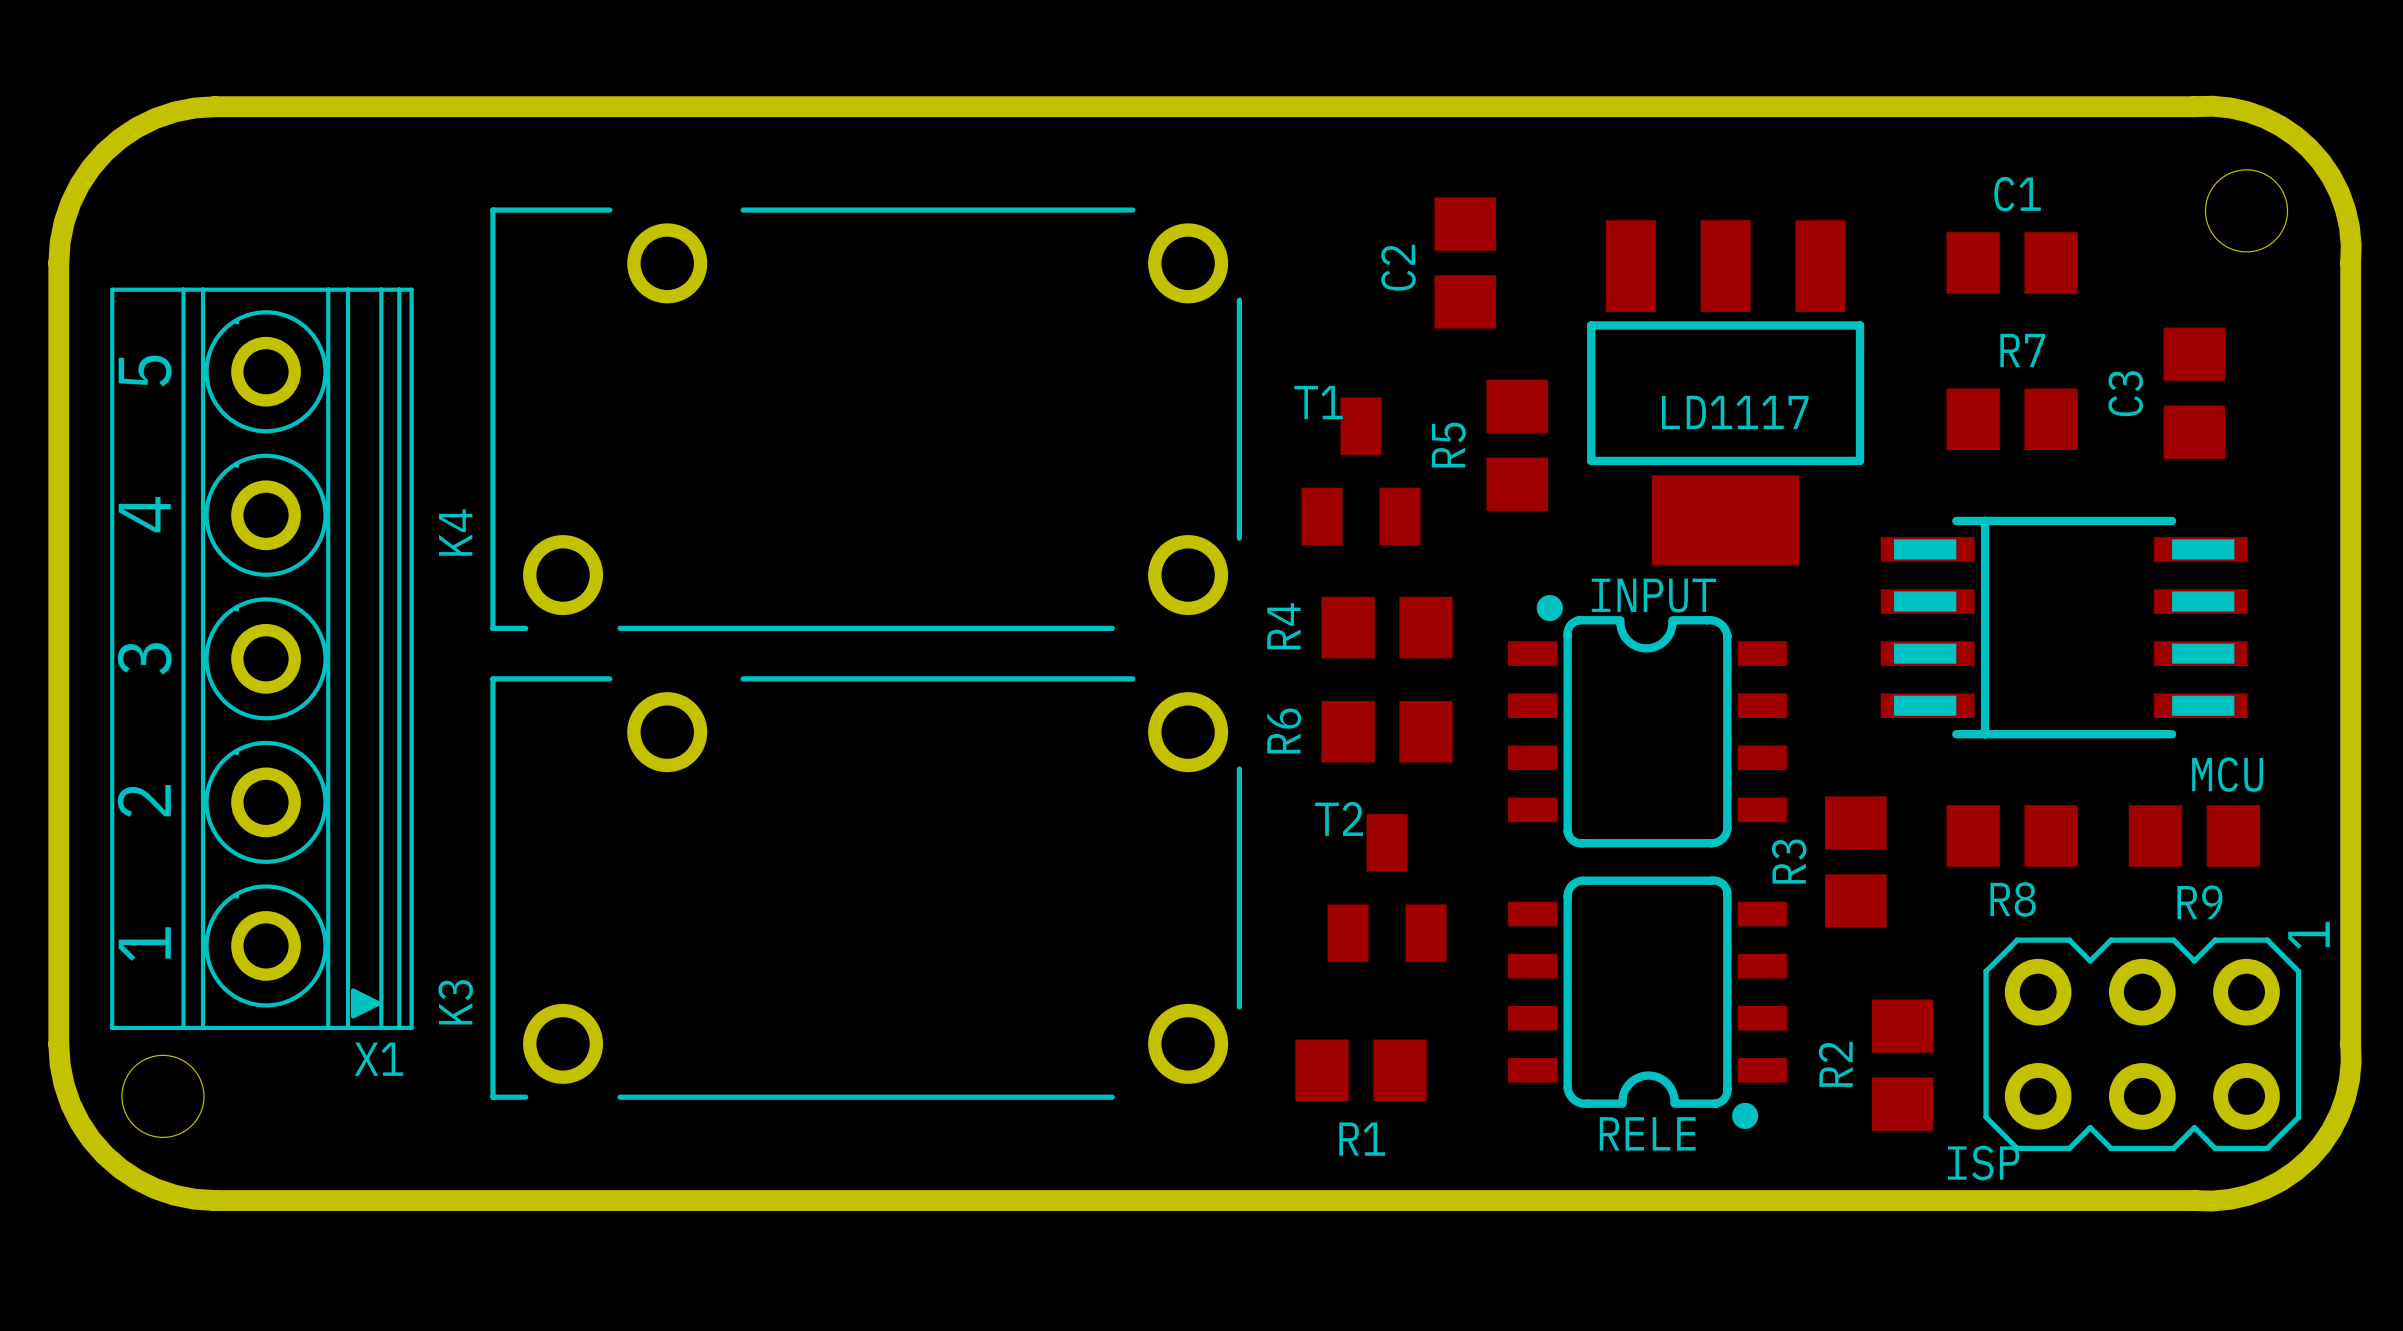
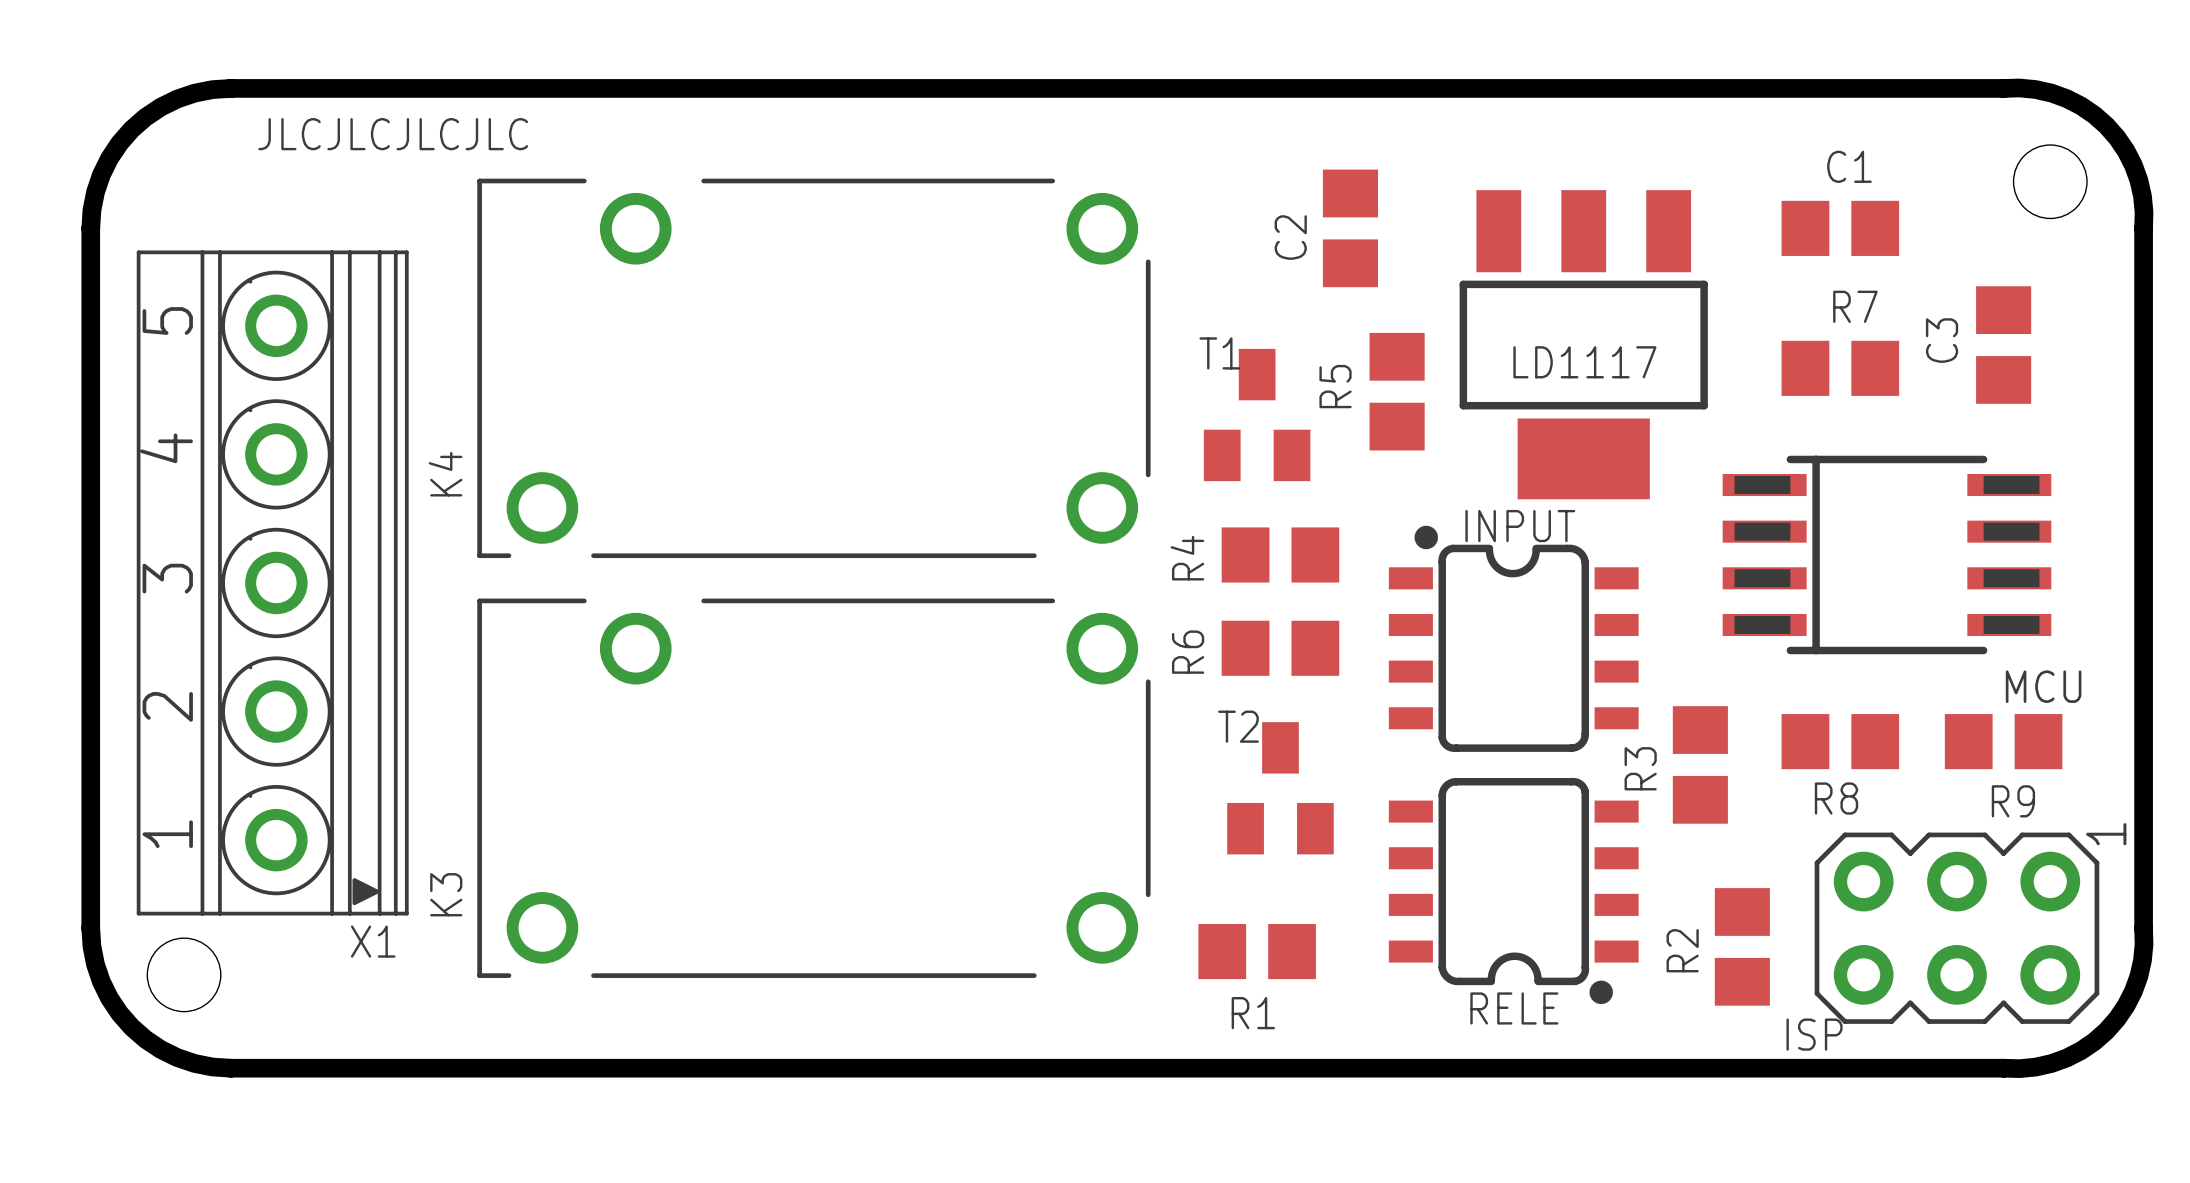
text: none -> JLCJLCJLCJLC (393, 134)

